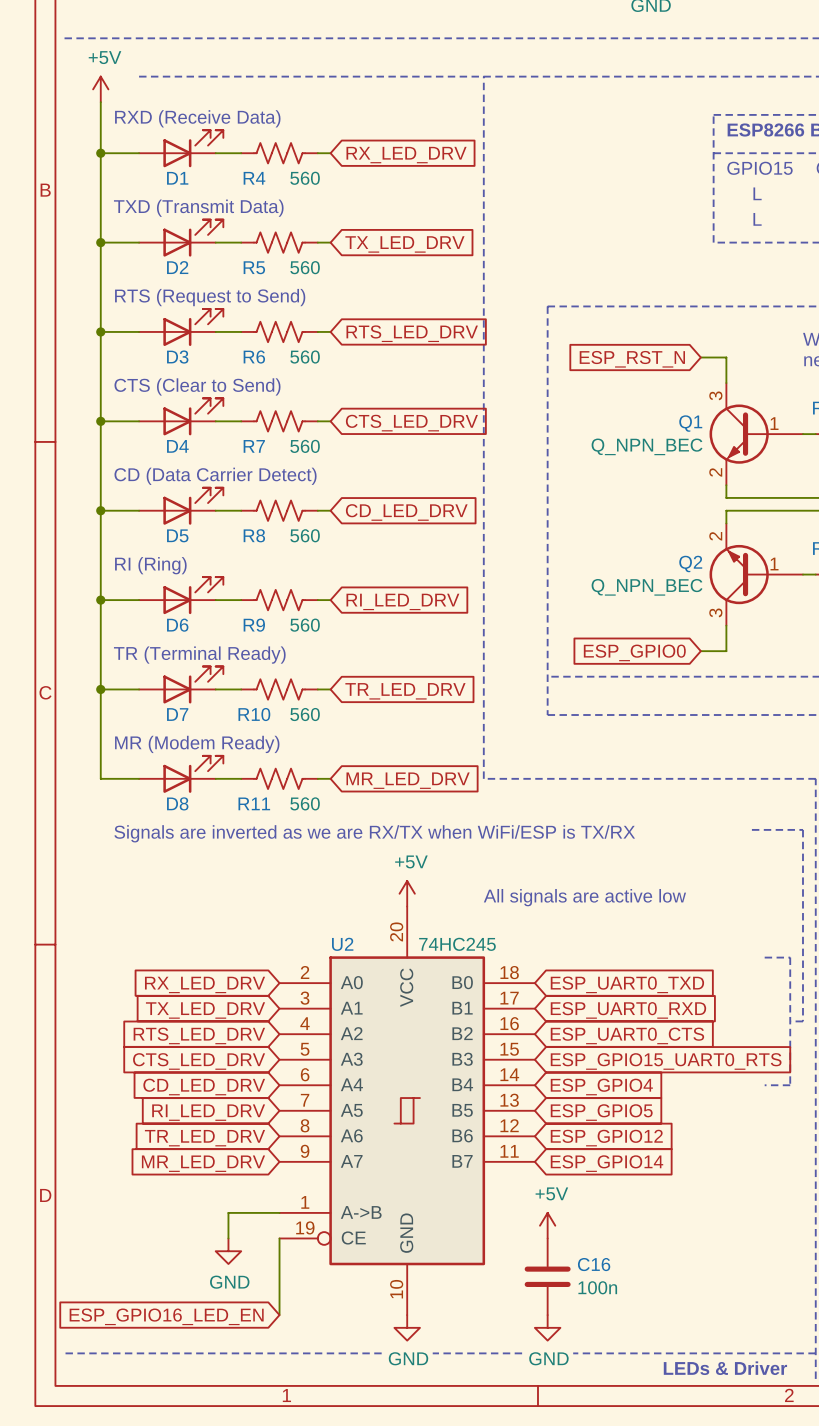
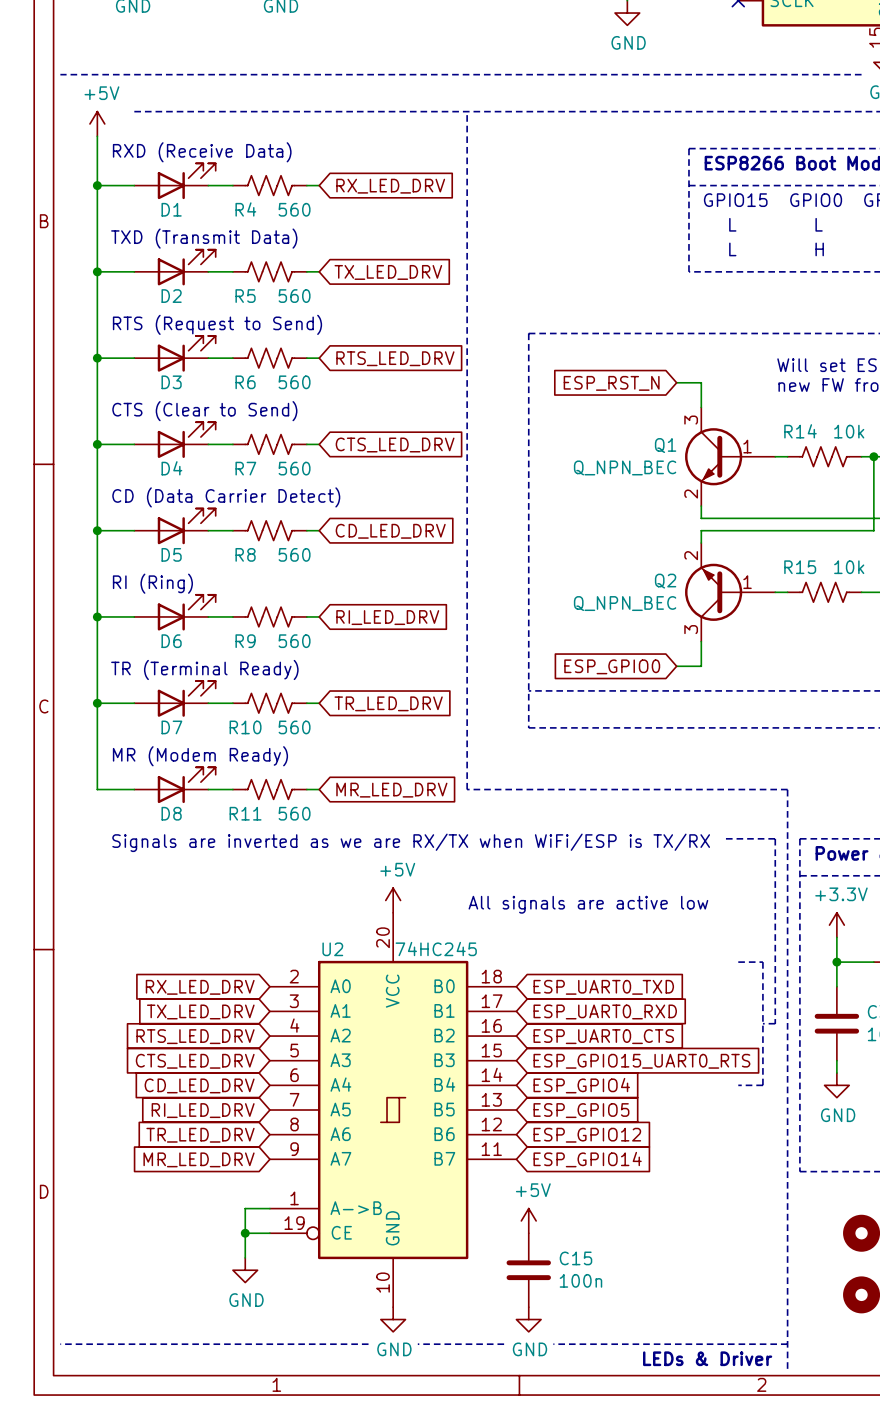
wire: (253, 1212) (228, 1212) (228, 1238) -> (245, 1208) (245, 1257)
junction: none -> (245, 1233)
wire: (279, 1238) (279, 1315) -> (269, 1233) (245, 1233)
power symbol position: GND (228, 1251) -> GND (245, 1270)
C16 name: C16 (594, 1264) -> C15 (575, 1258)
global label: ESP_GPIO16_LED_EN (166, 1316) -> none

